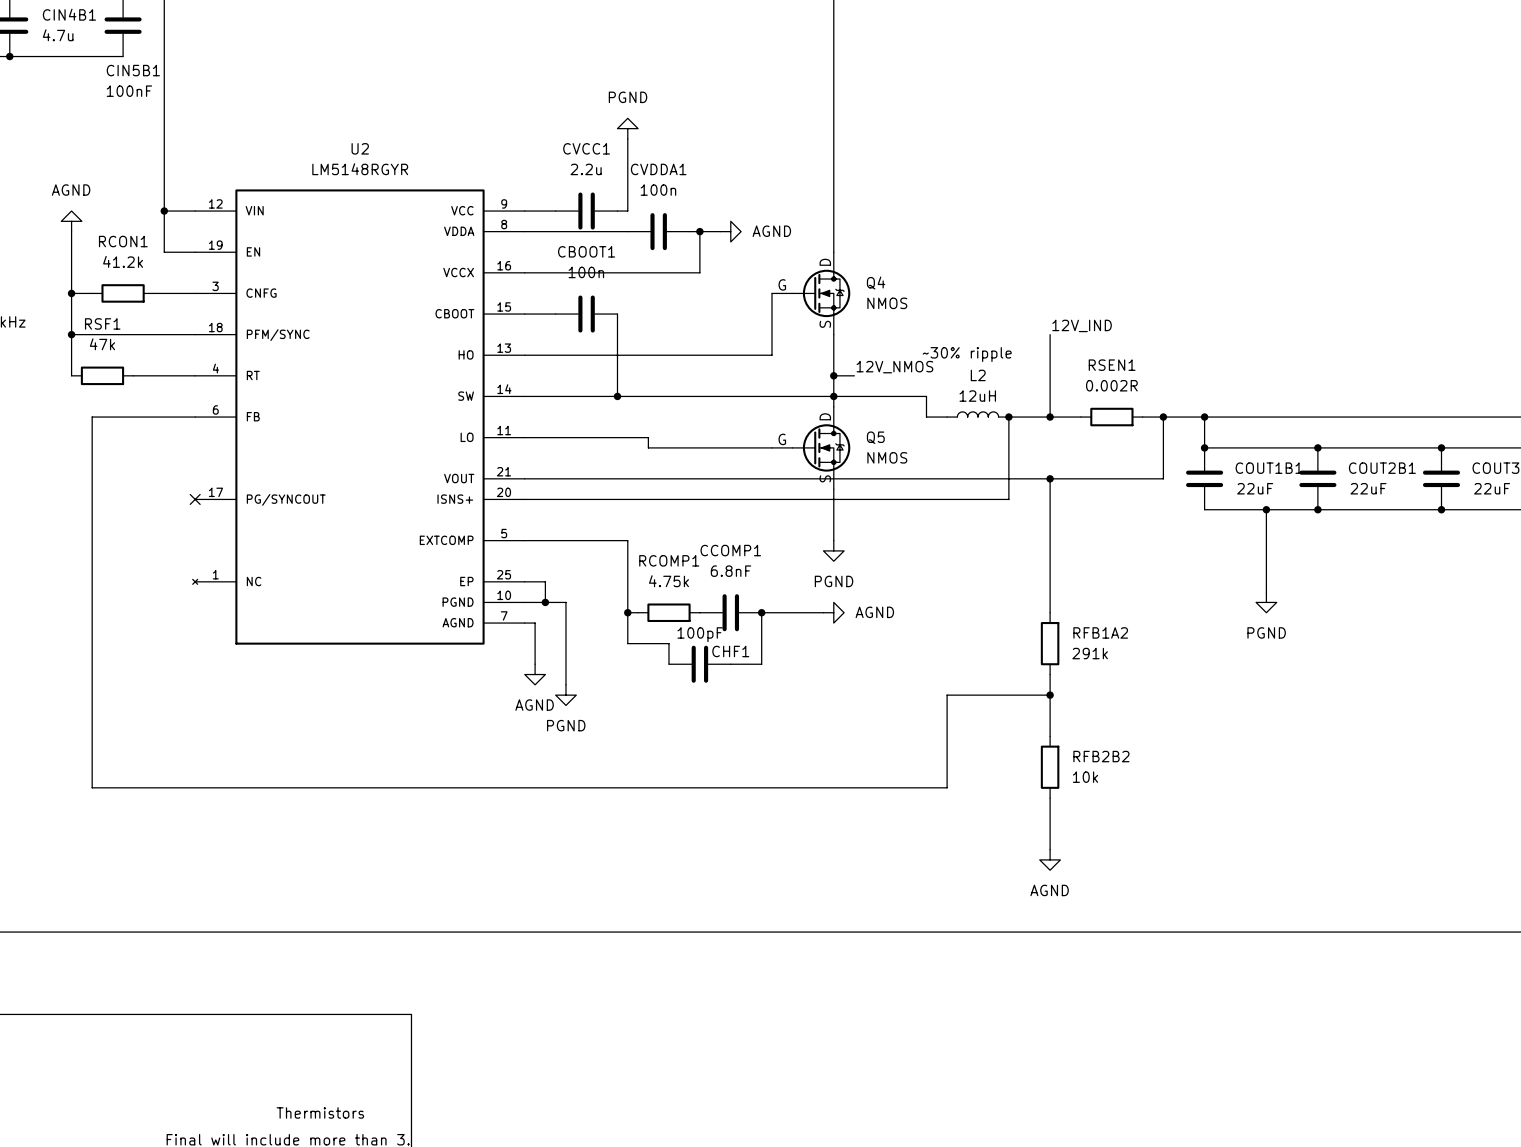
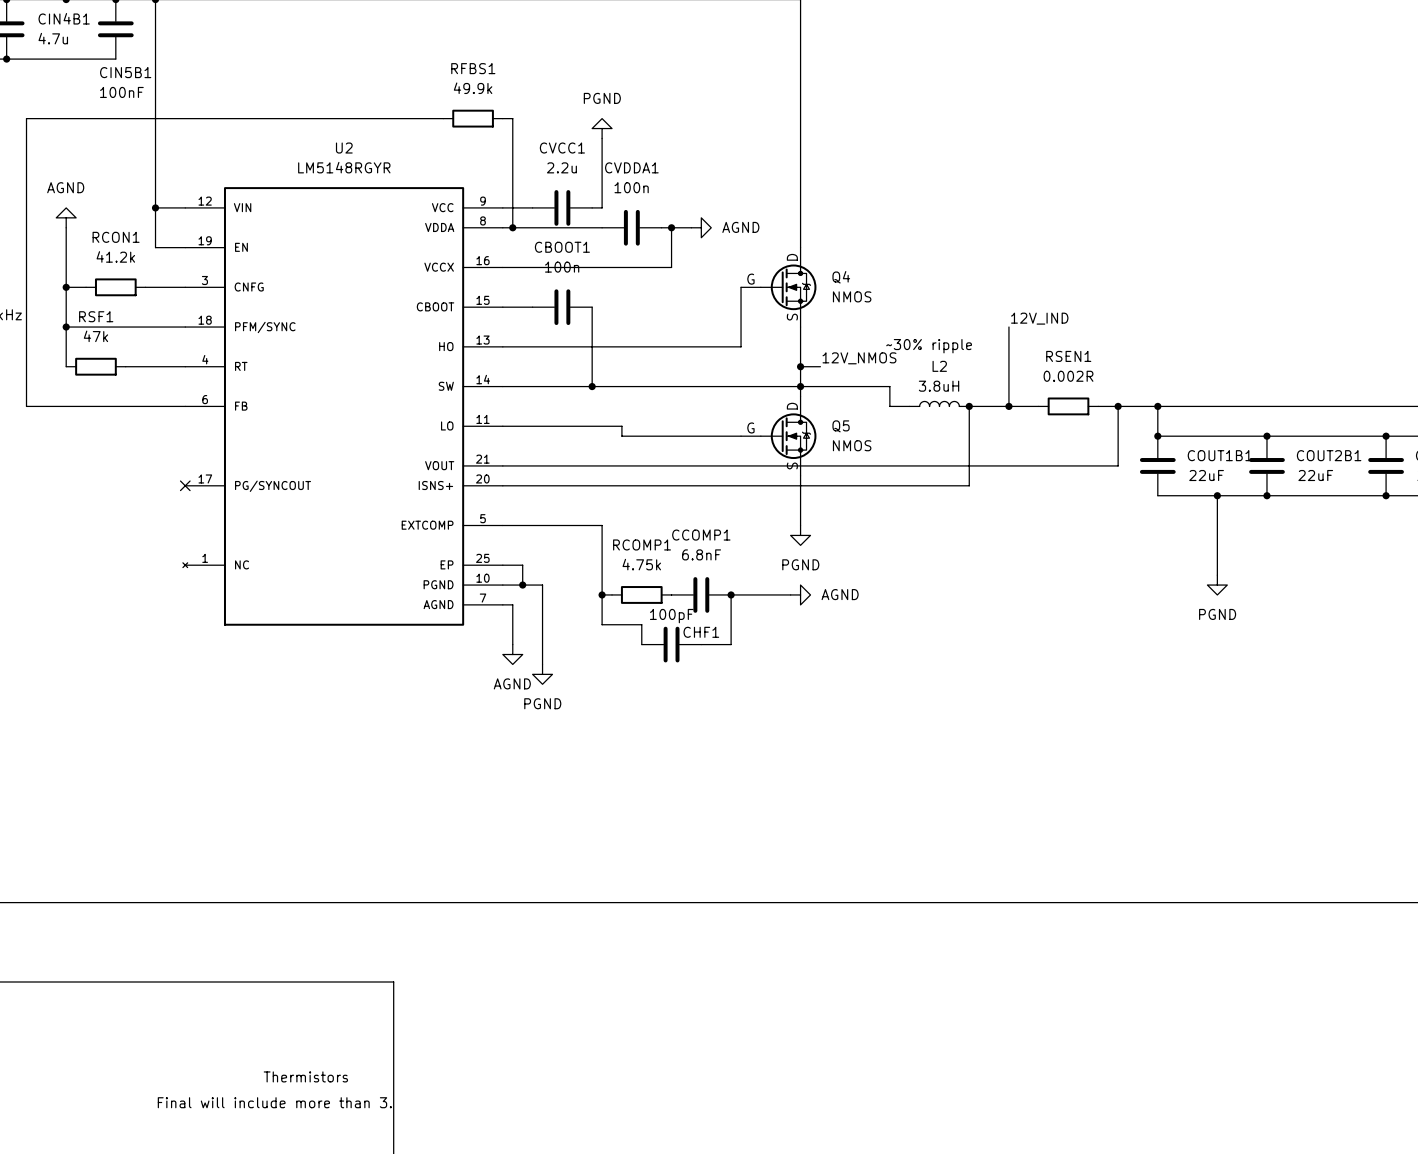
RFBS1: none -> 49.9k (473, 118)
wire: none -> (502, 118) (512, 118) (512, 227)
junction: none -> (512, 227)
L2 value: 12uH (977, 396) -> 3.8uH (939, 386)
wire: (92, 417) (92, 787) (947, 787) (947, 695) (1050, 695) -> (86, 406) (26, 406) (26, 118) (443, 118)
wire: (1050, 478) (1050, 612) -> none
junction: (1050, 478) -> none
RFB1A2: 291k (1050, 643) -> none
wire: (1050, 674) (1050, 736) -> none
junction: (1050, 695) -> none
RFB2B2: 10k (1050, 767) -> none
wire: (1050, 798) (1050, 849) -> none
power symbol: AGND (1050, 859) -> none

